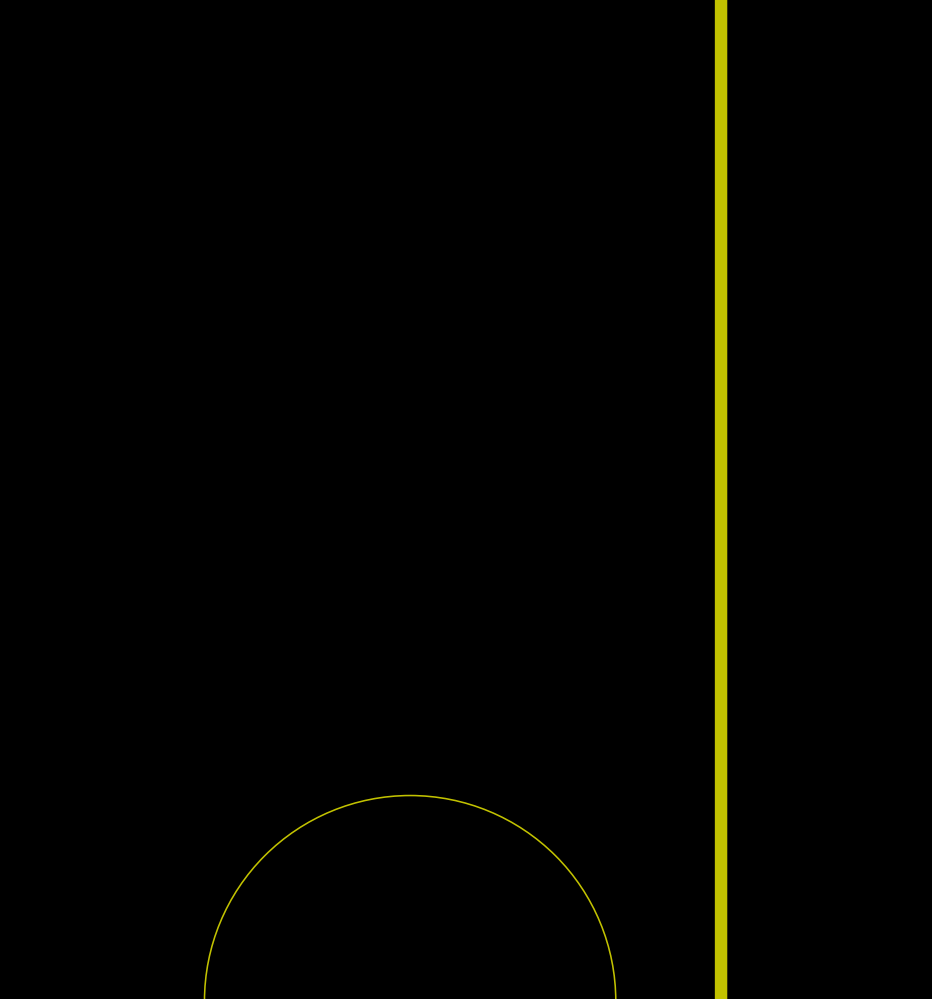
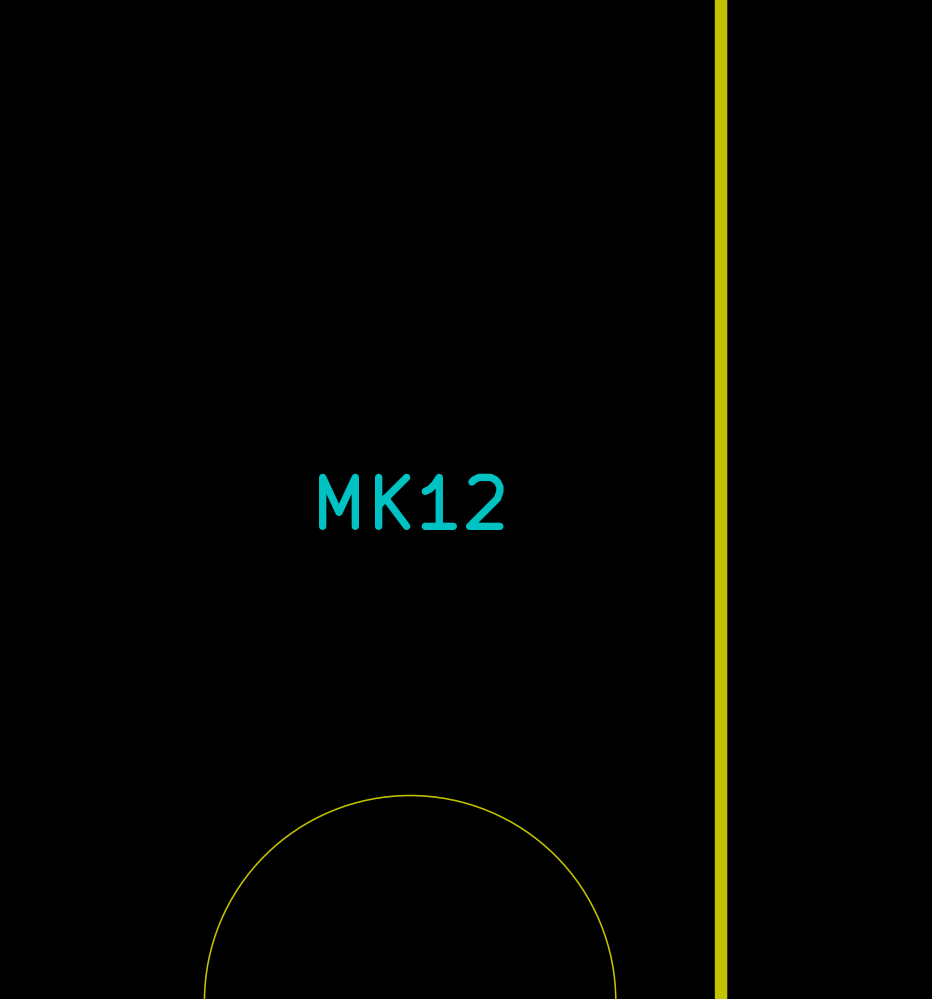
MK12 name: none -> MK12 (411, 501)

